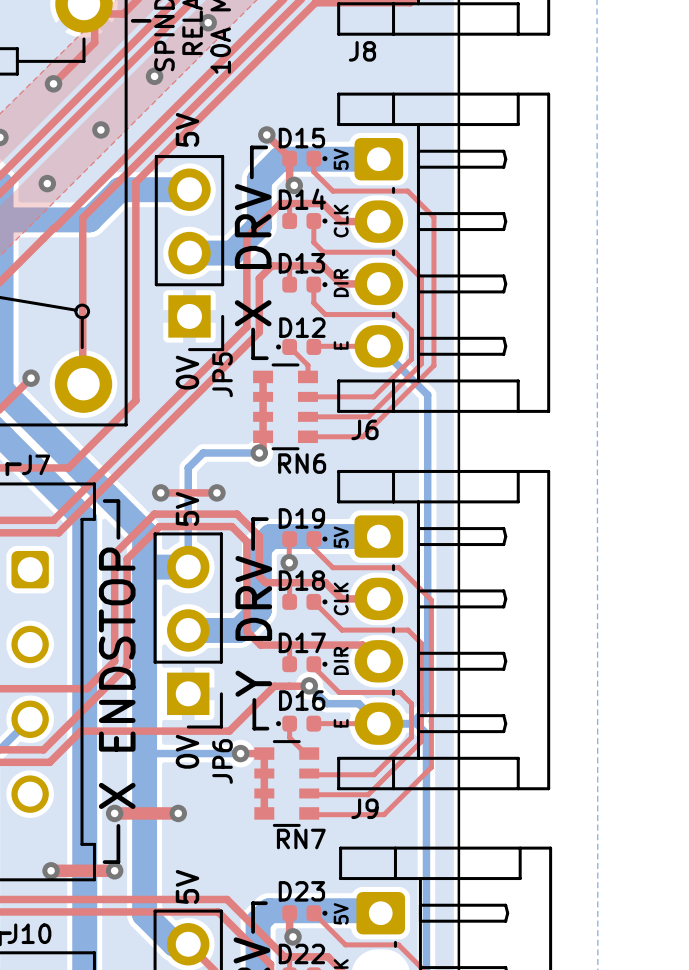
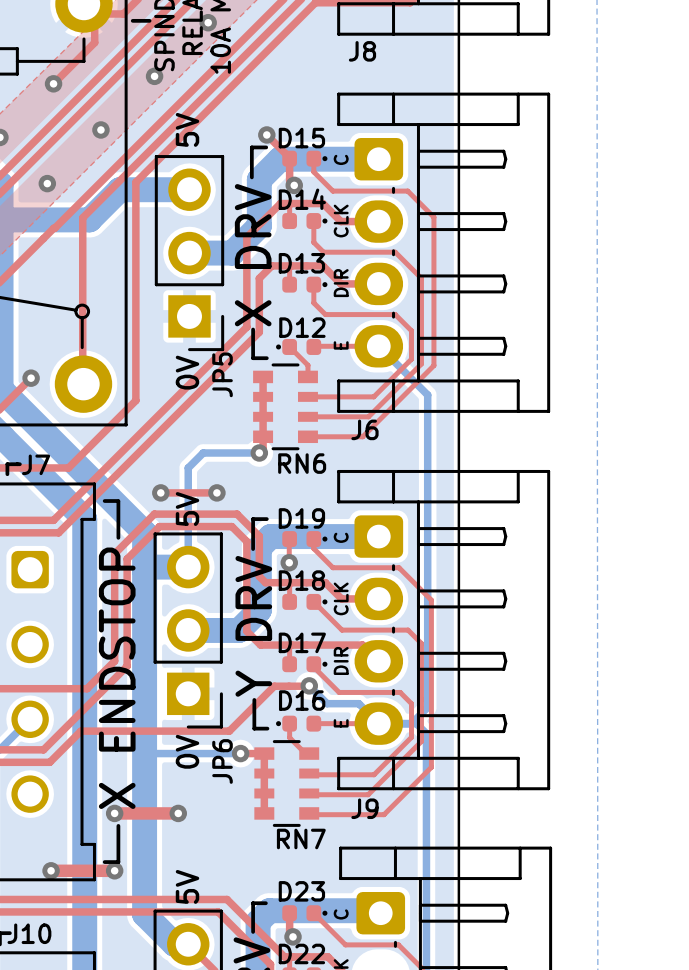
text: 5V (341, 159) -> C (341, 159)
text: 5V (341, 537) -> C (341, 537)
text: 5V (341, 913) -> C (341, 914)

